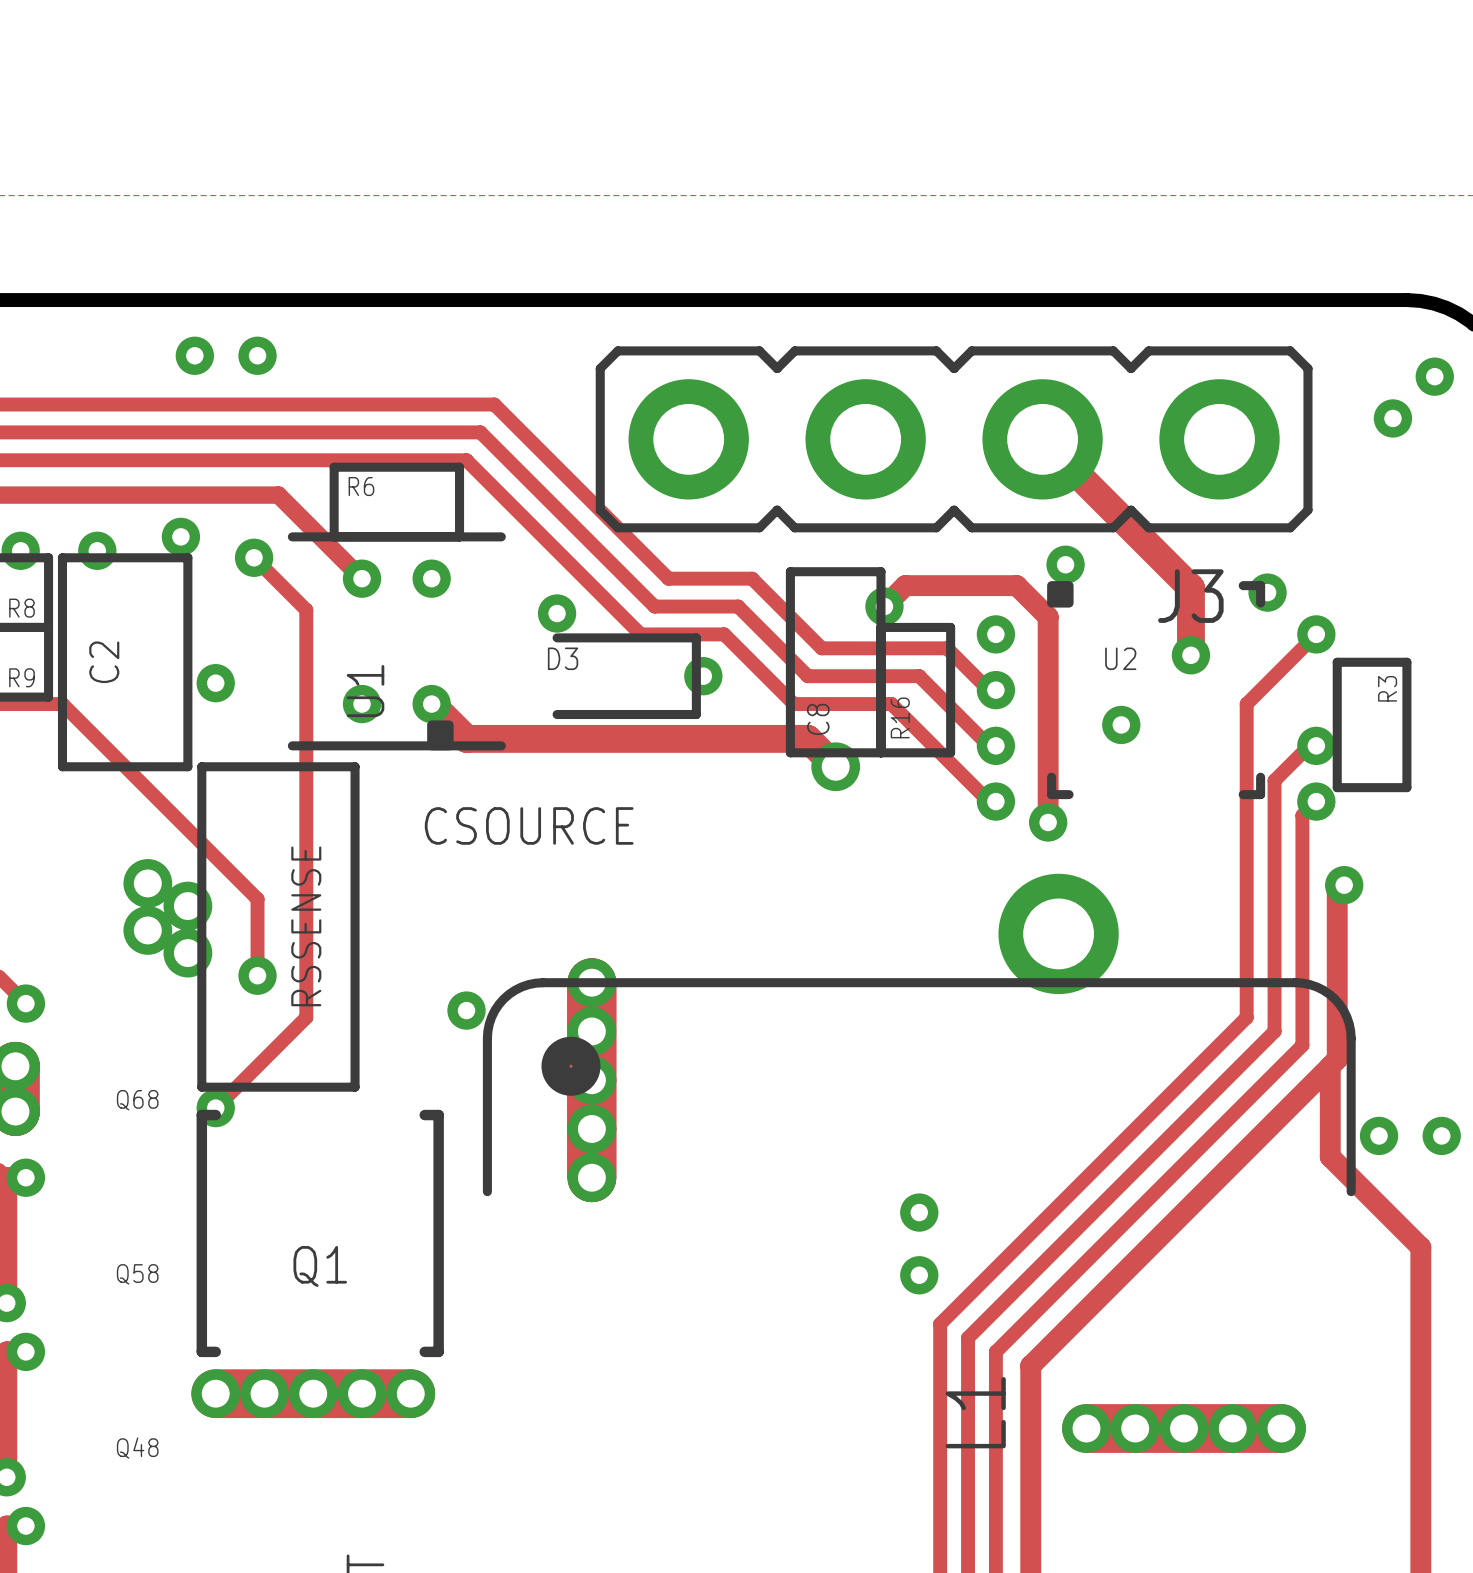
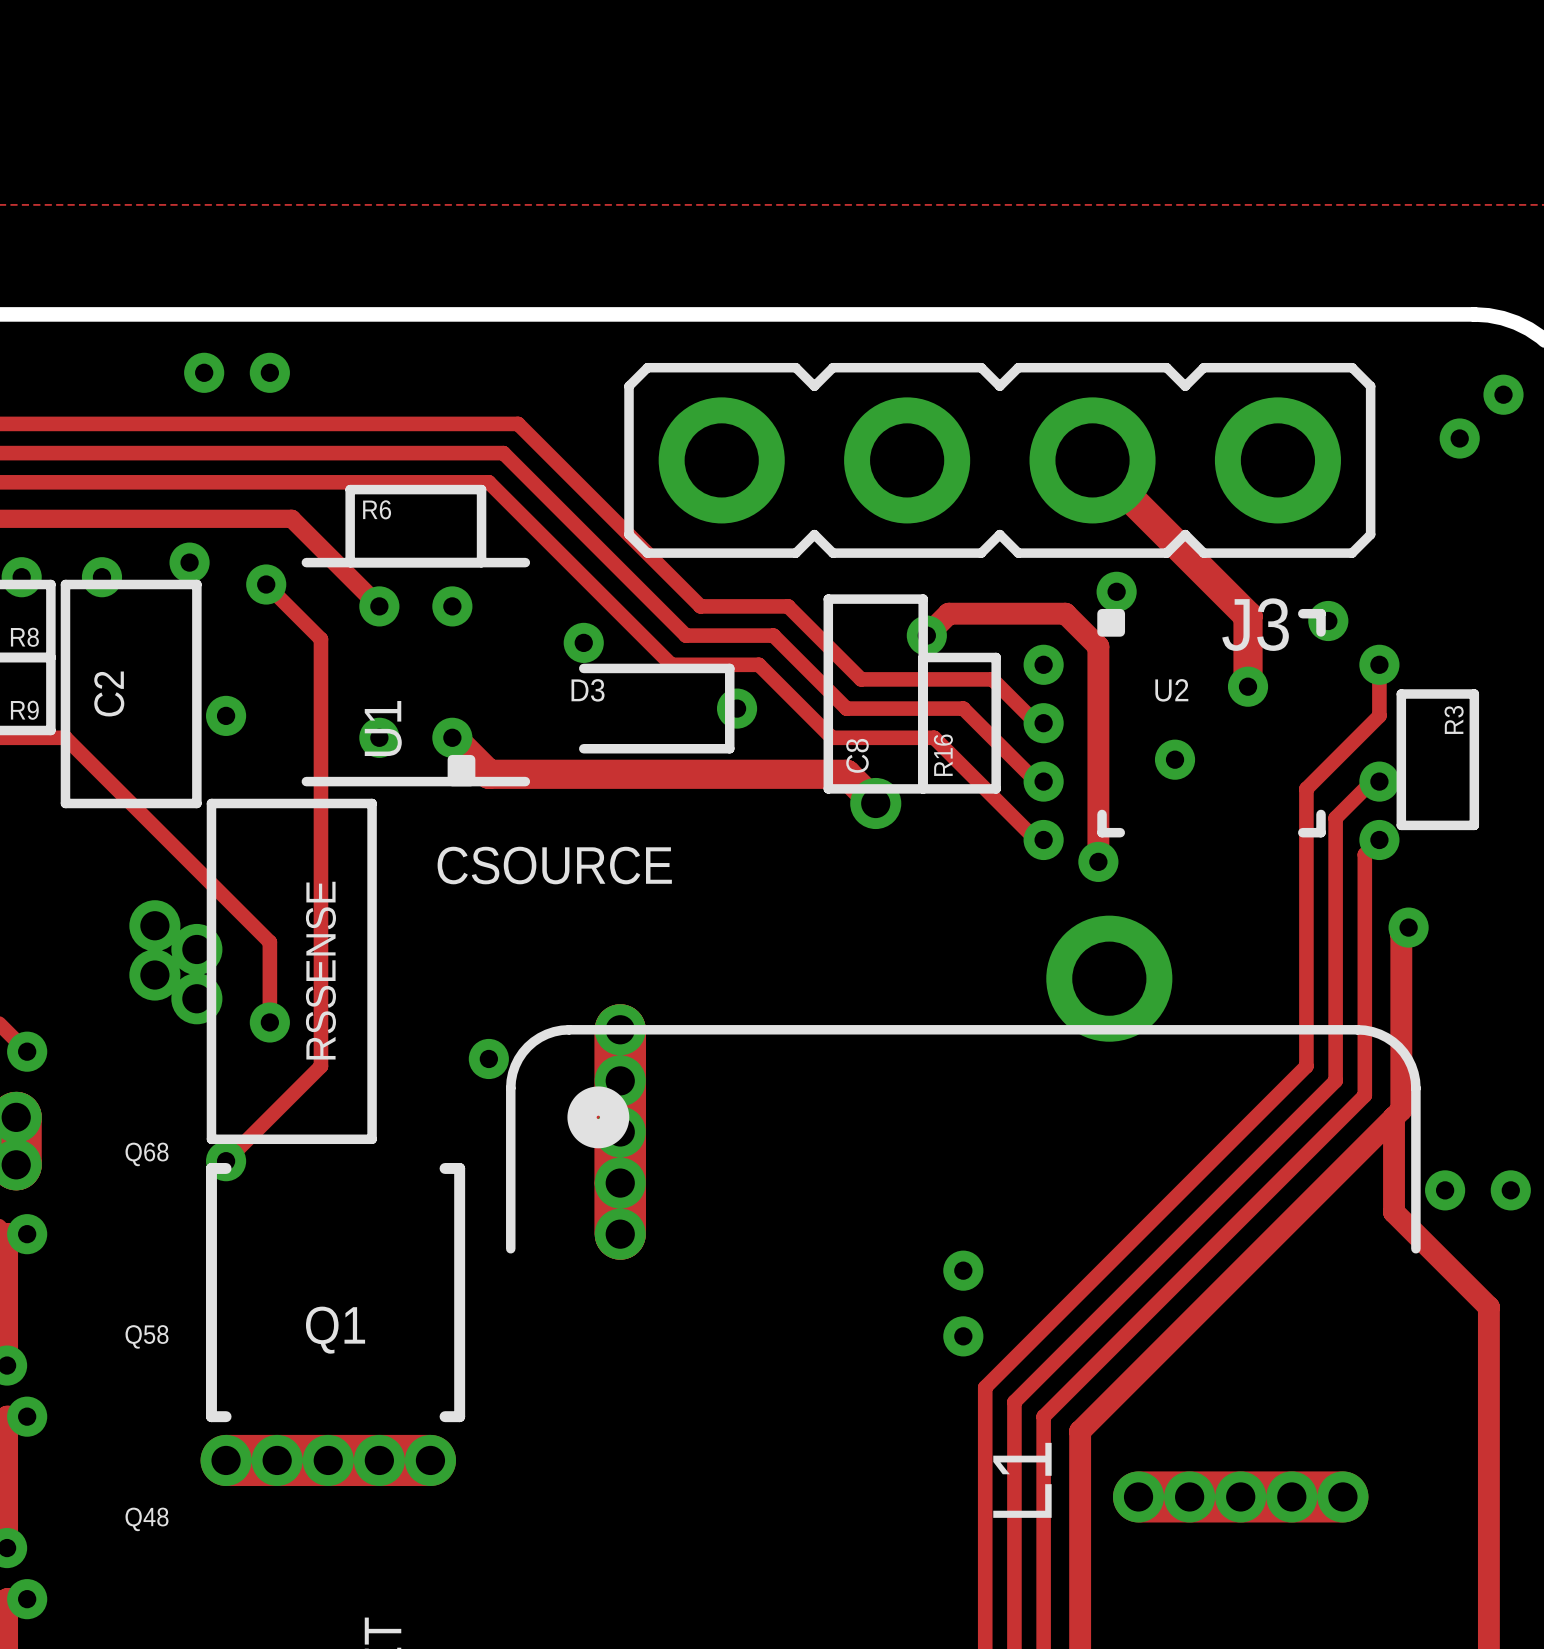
track: (1316, 634) (1246, 704) (1246, 752) -> (1379, 664) (1379, 715) (1306, 788)

